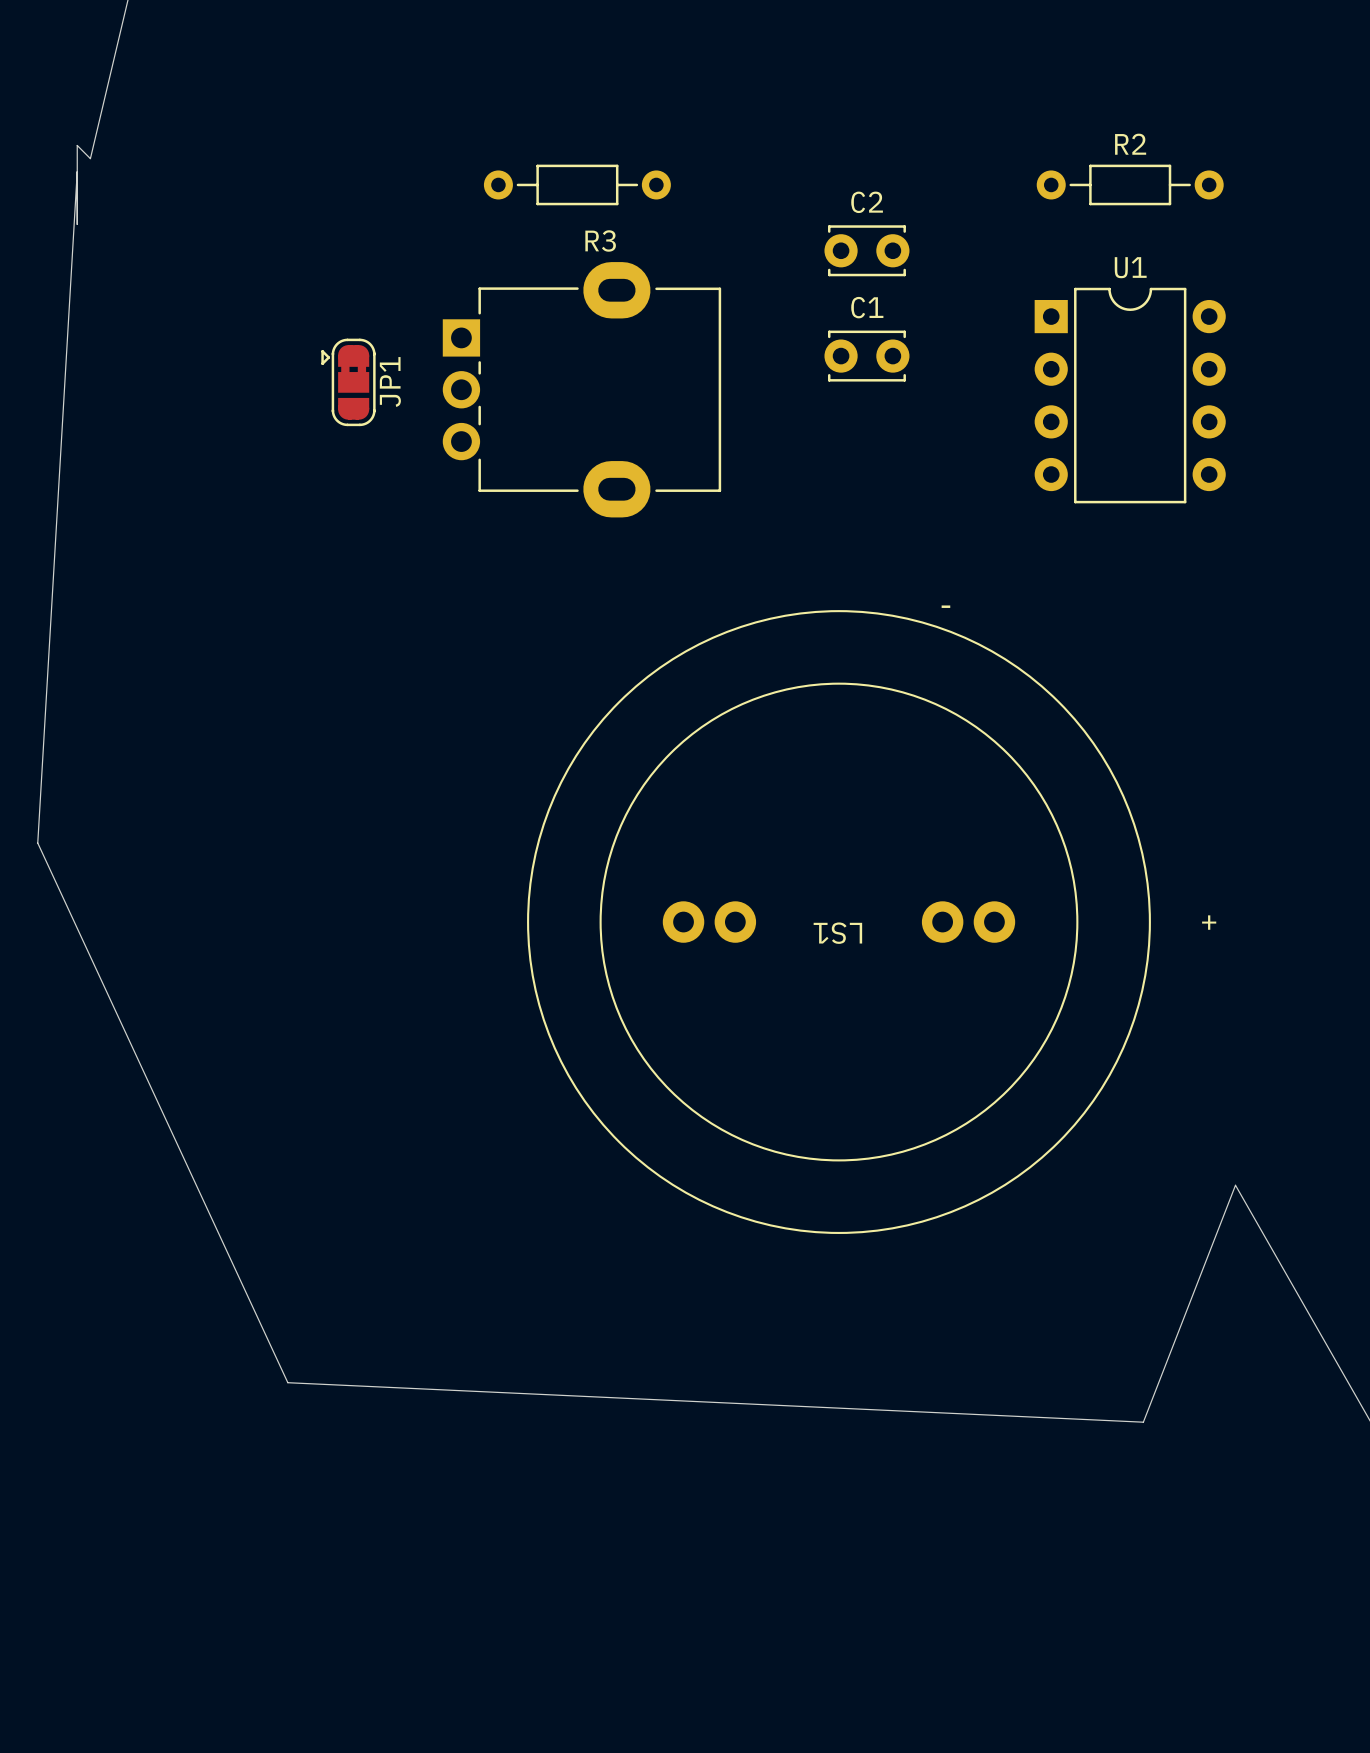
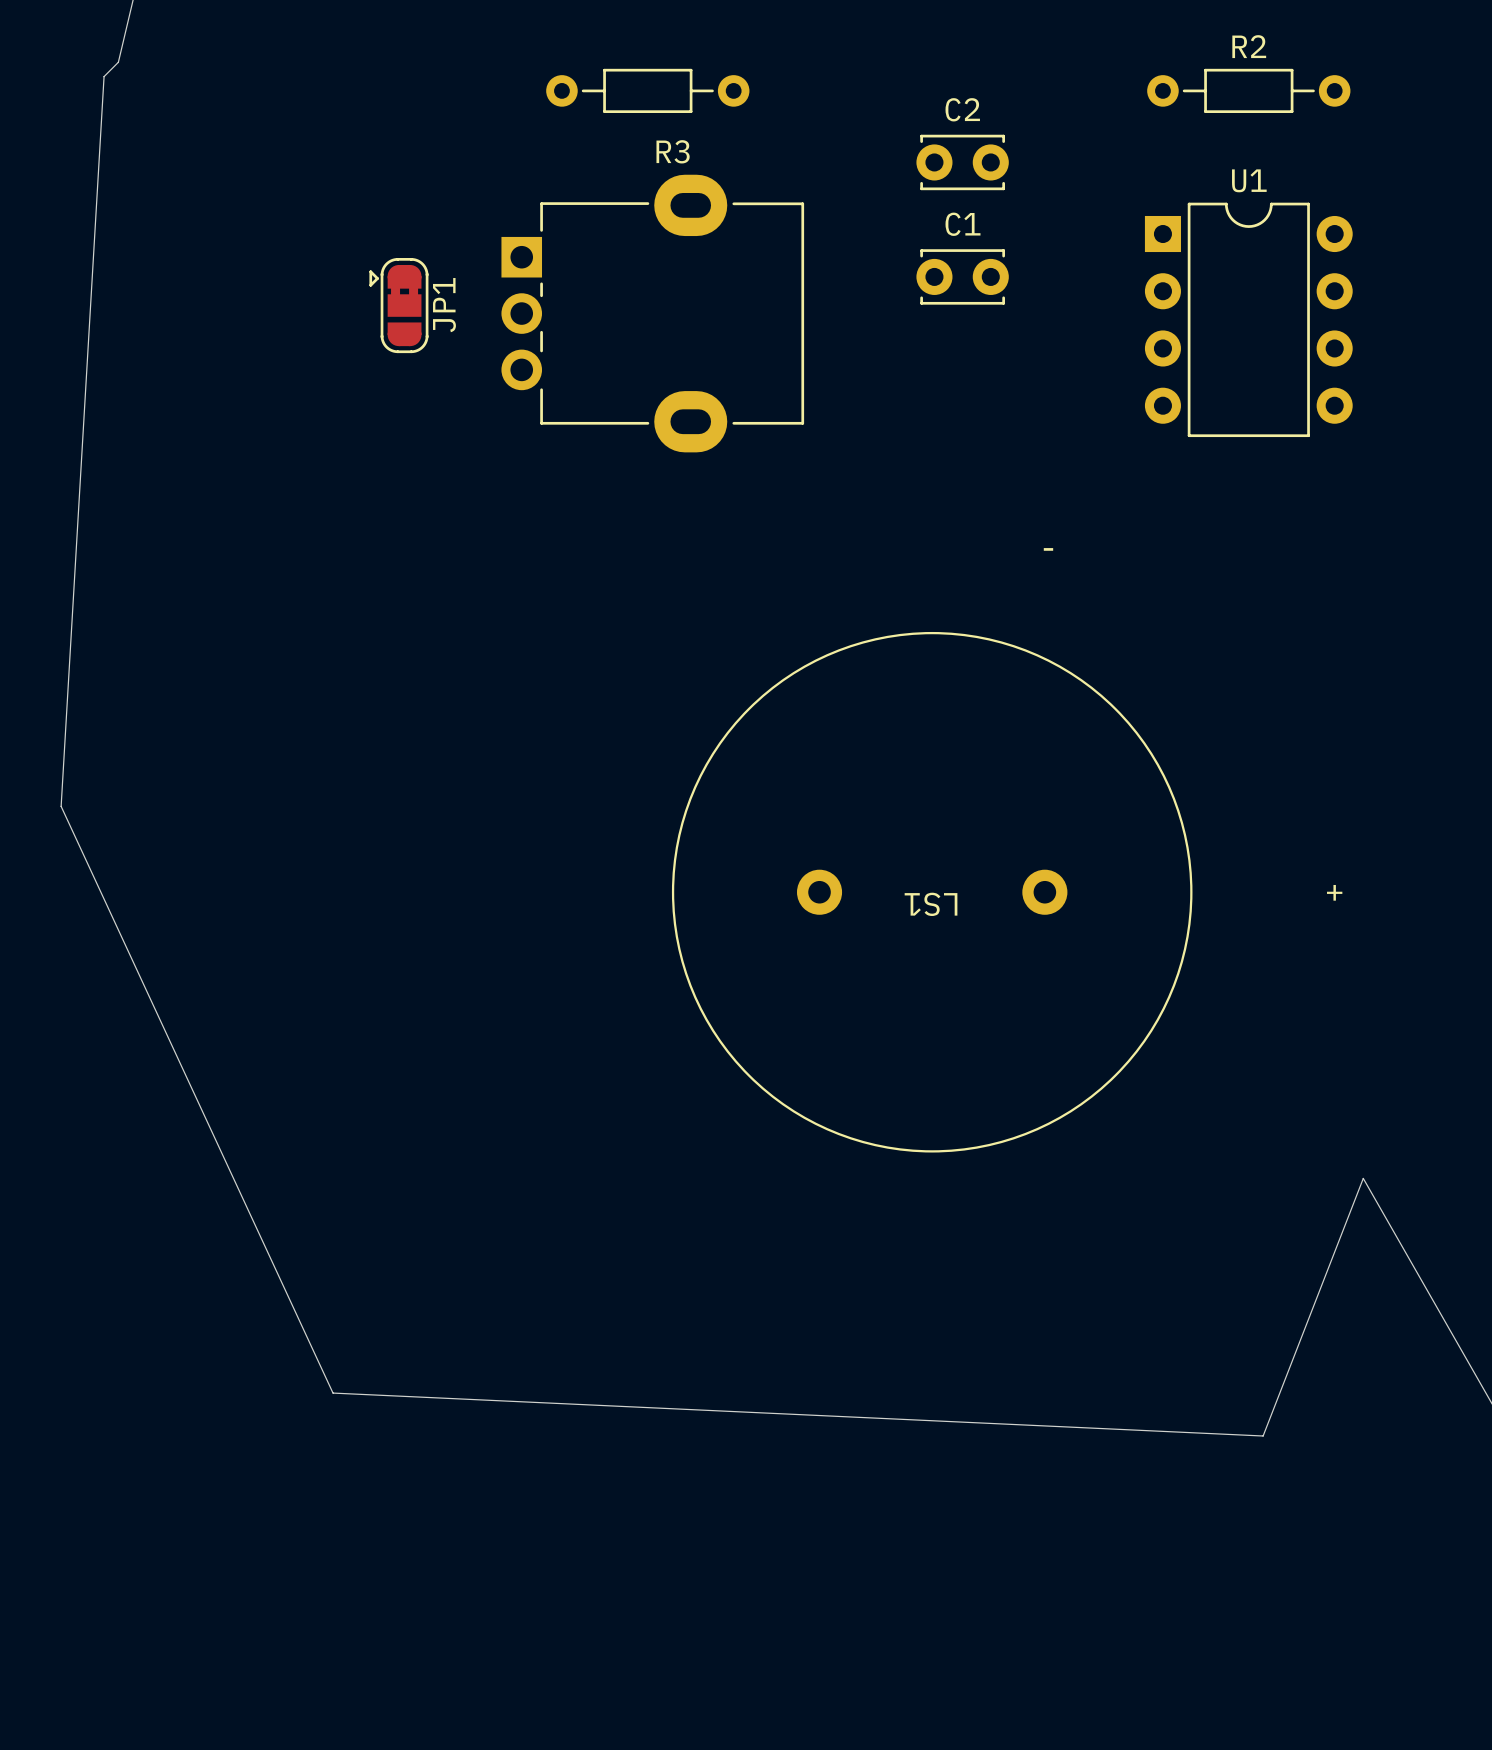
board edge: (90, 158) (77, 145) (77, 224) -> (118, 62) (104, 76)
LS1 footprint: [527, 610, 1151, 1234] -> [671, 631, 1193, 1153]

